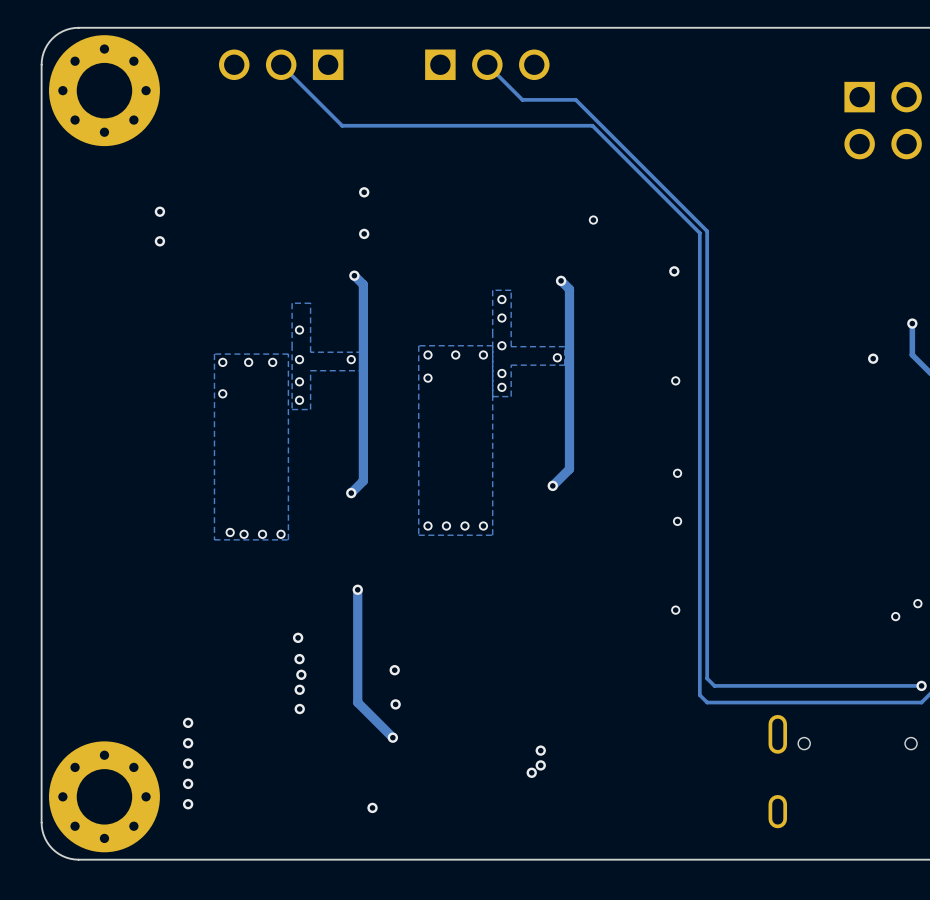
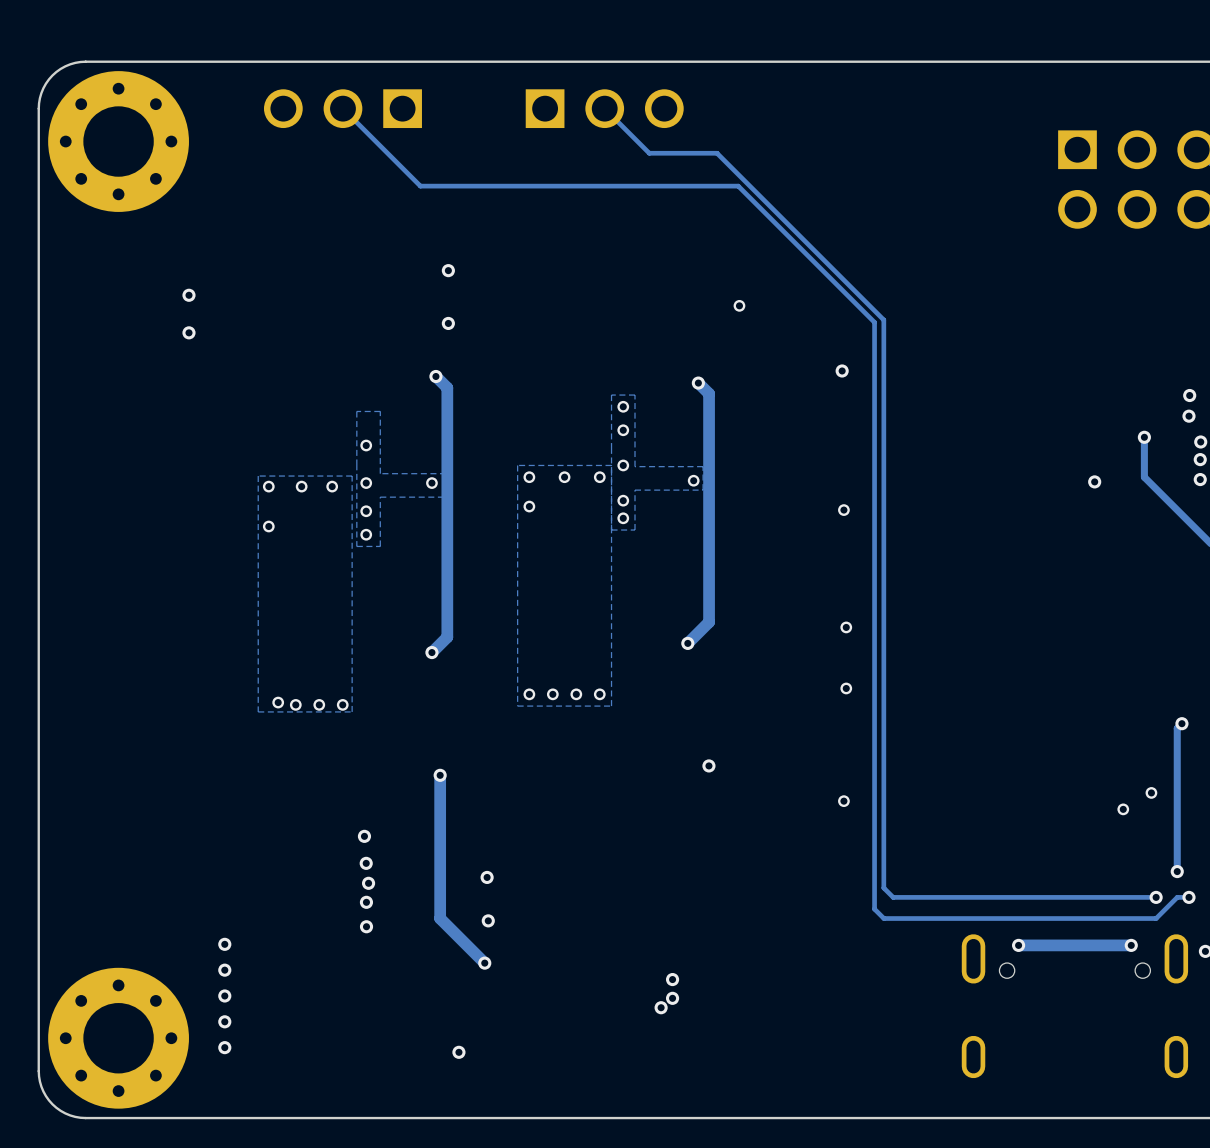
via: none -> (708, 765)
via: none -> (1018, 945)
track: none -> (1131, 945) (1018, 945)
via: none -> (1131, 945)

